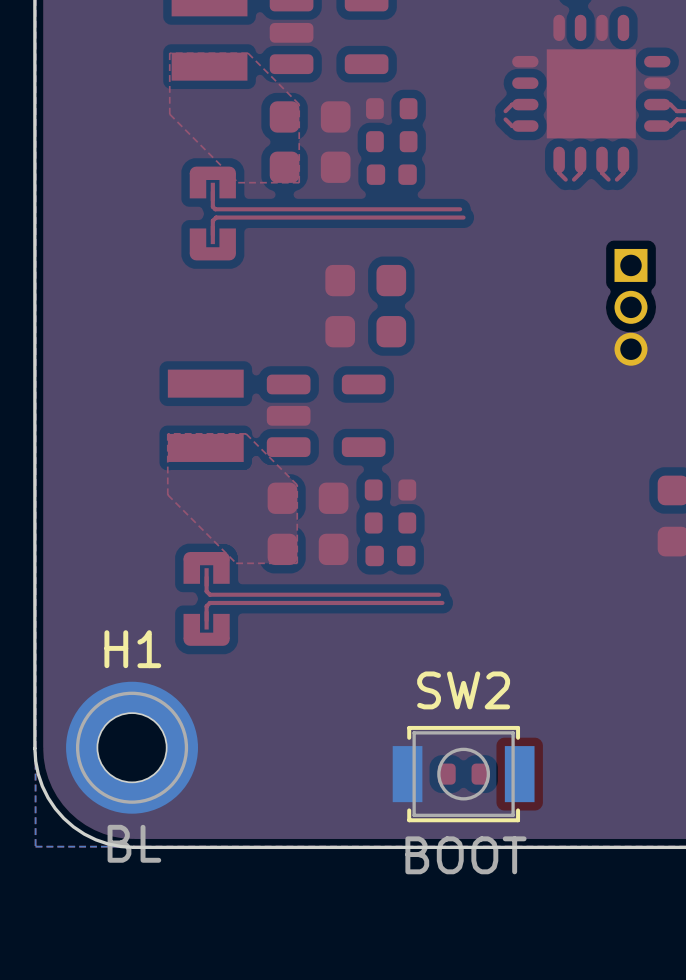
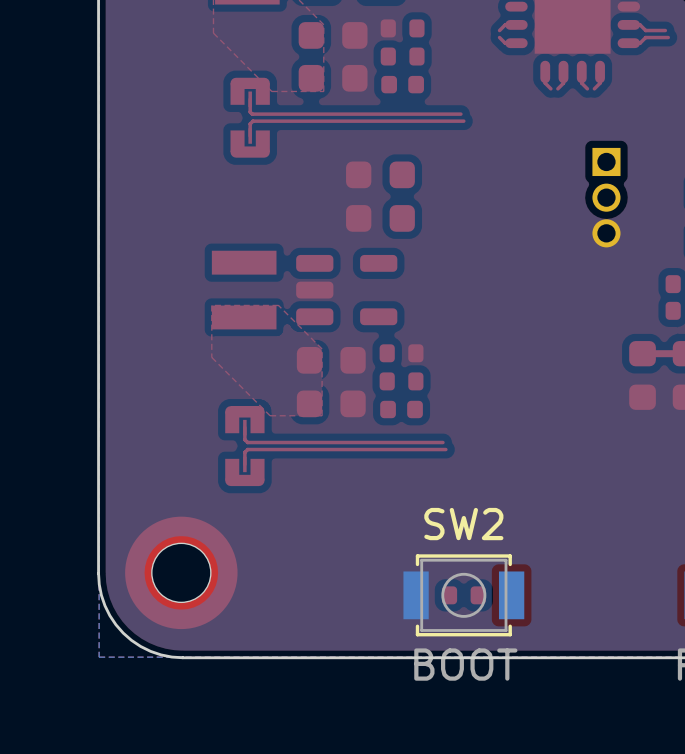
H1 side: bottom (132, 747) -> top (181, 572)

